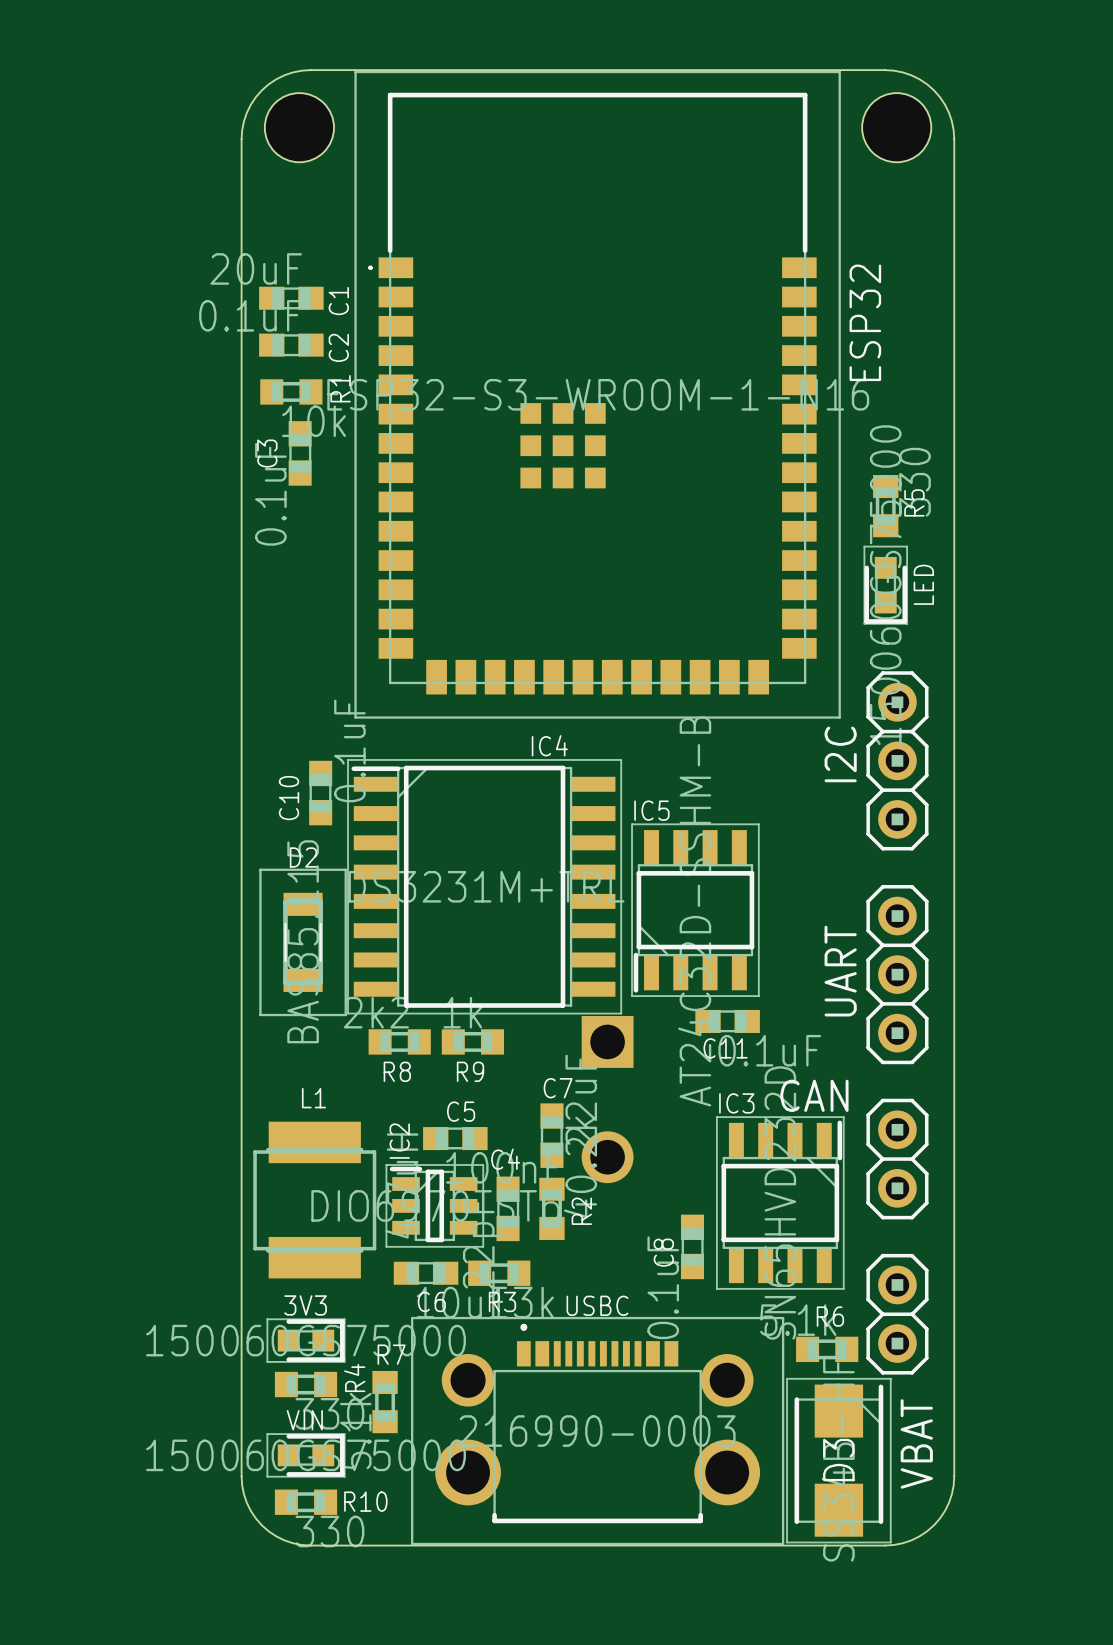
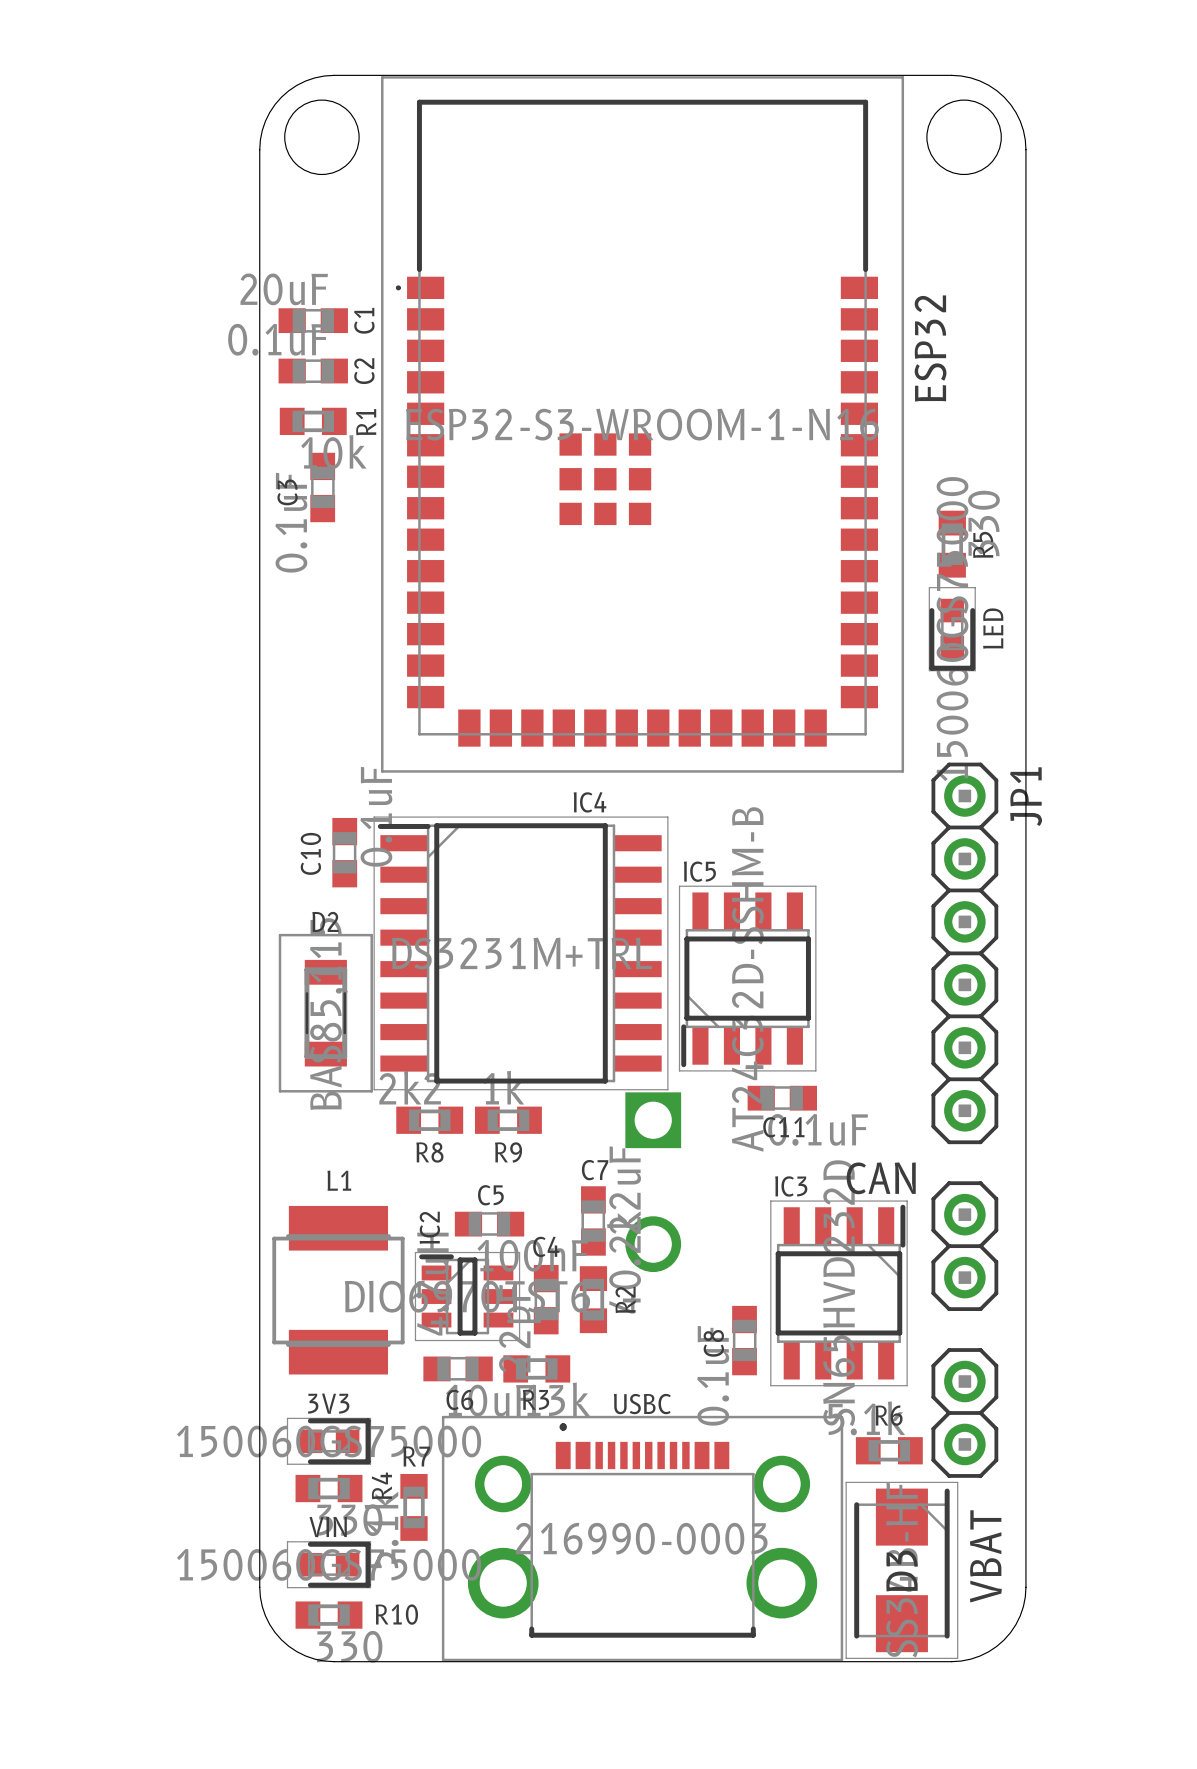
I2C: (897, 760) -> none
JP1: none -> (964, 953)
UART: (897, 974) -> none

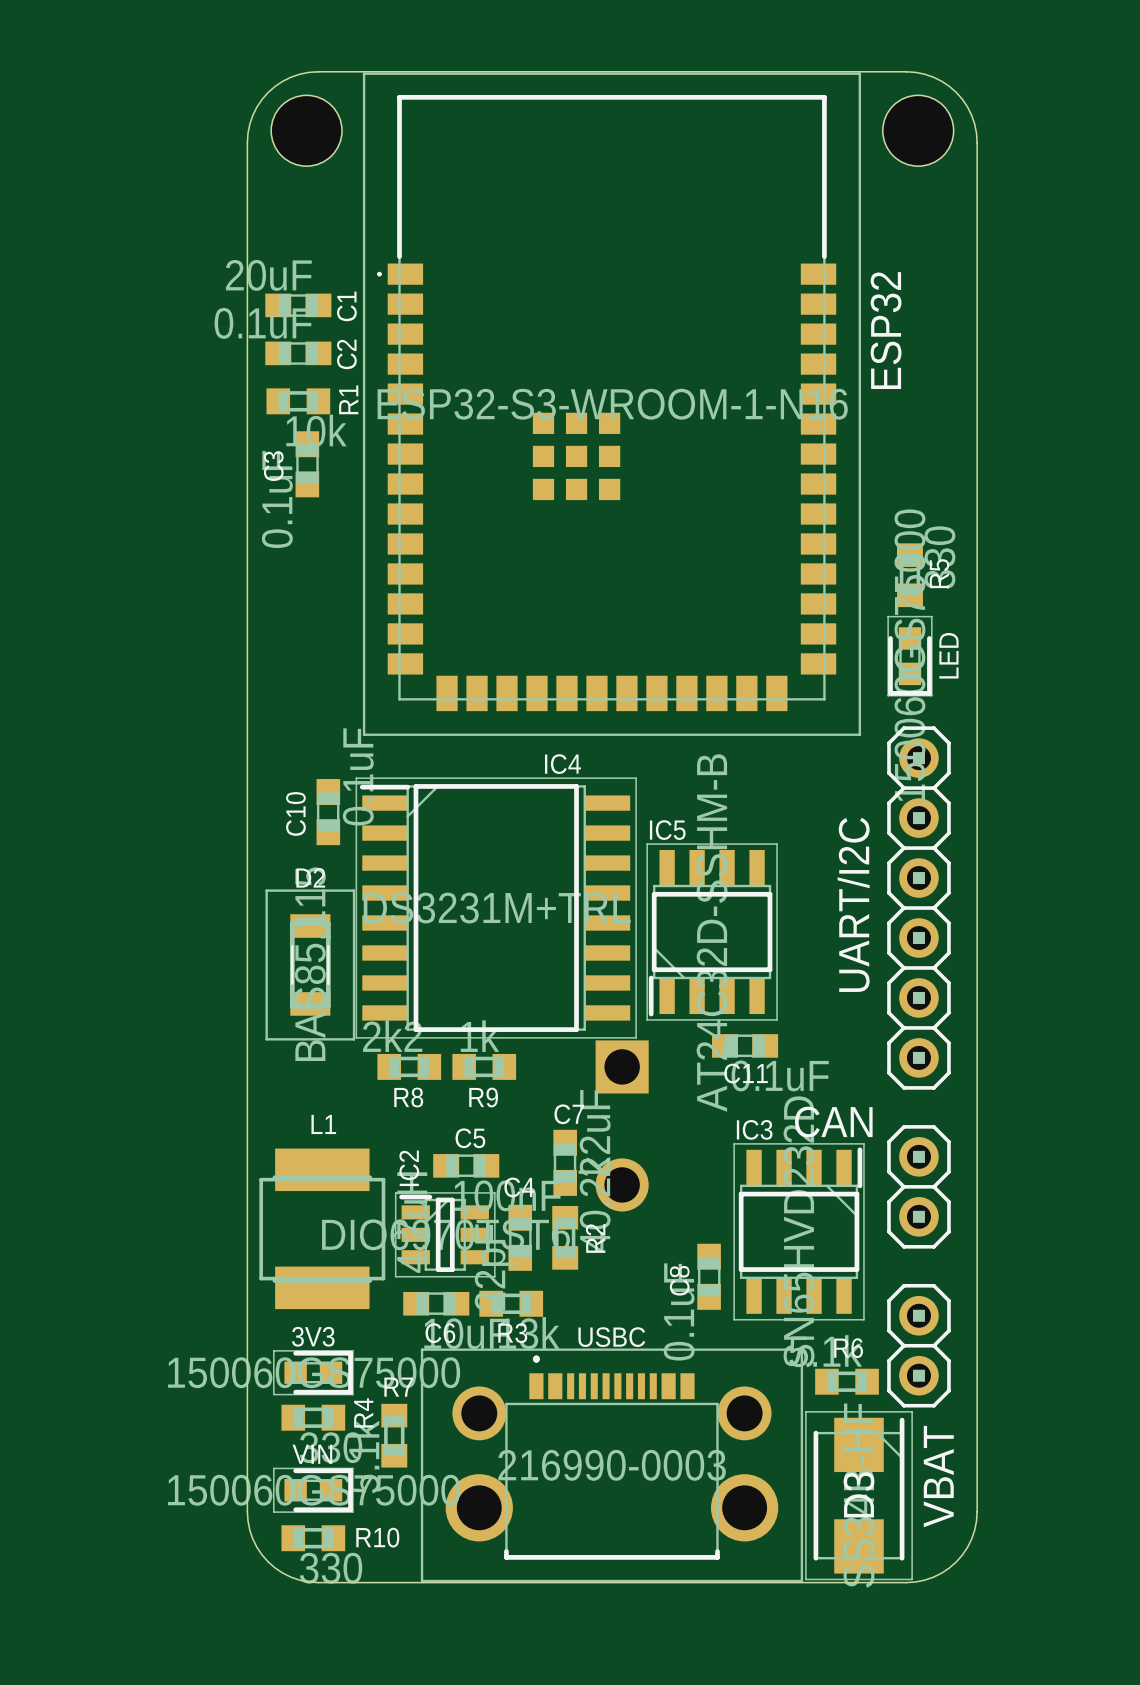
R5 position: (952, 544) -> (909, 575)
LED position: (952, 629) -> (909, 656)
JP1 name: JP1 (1026, 796) -> UART/I2C (853, 904)

